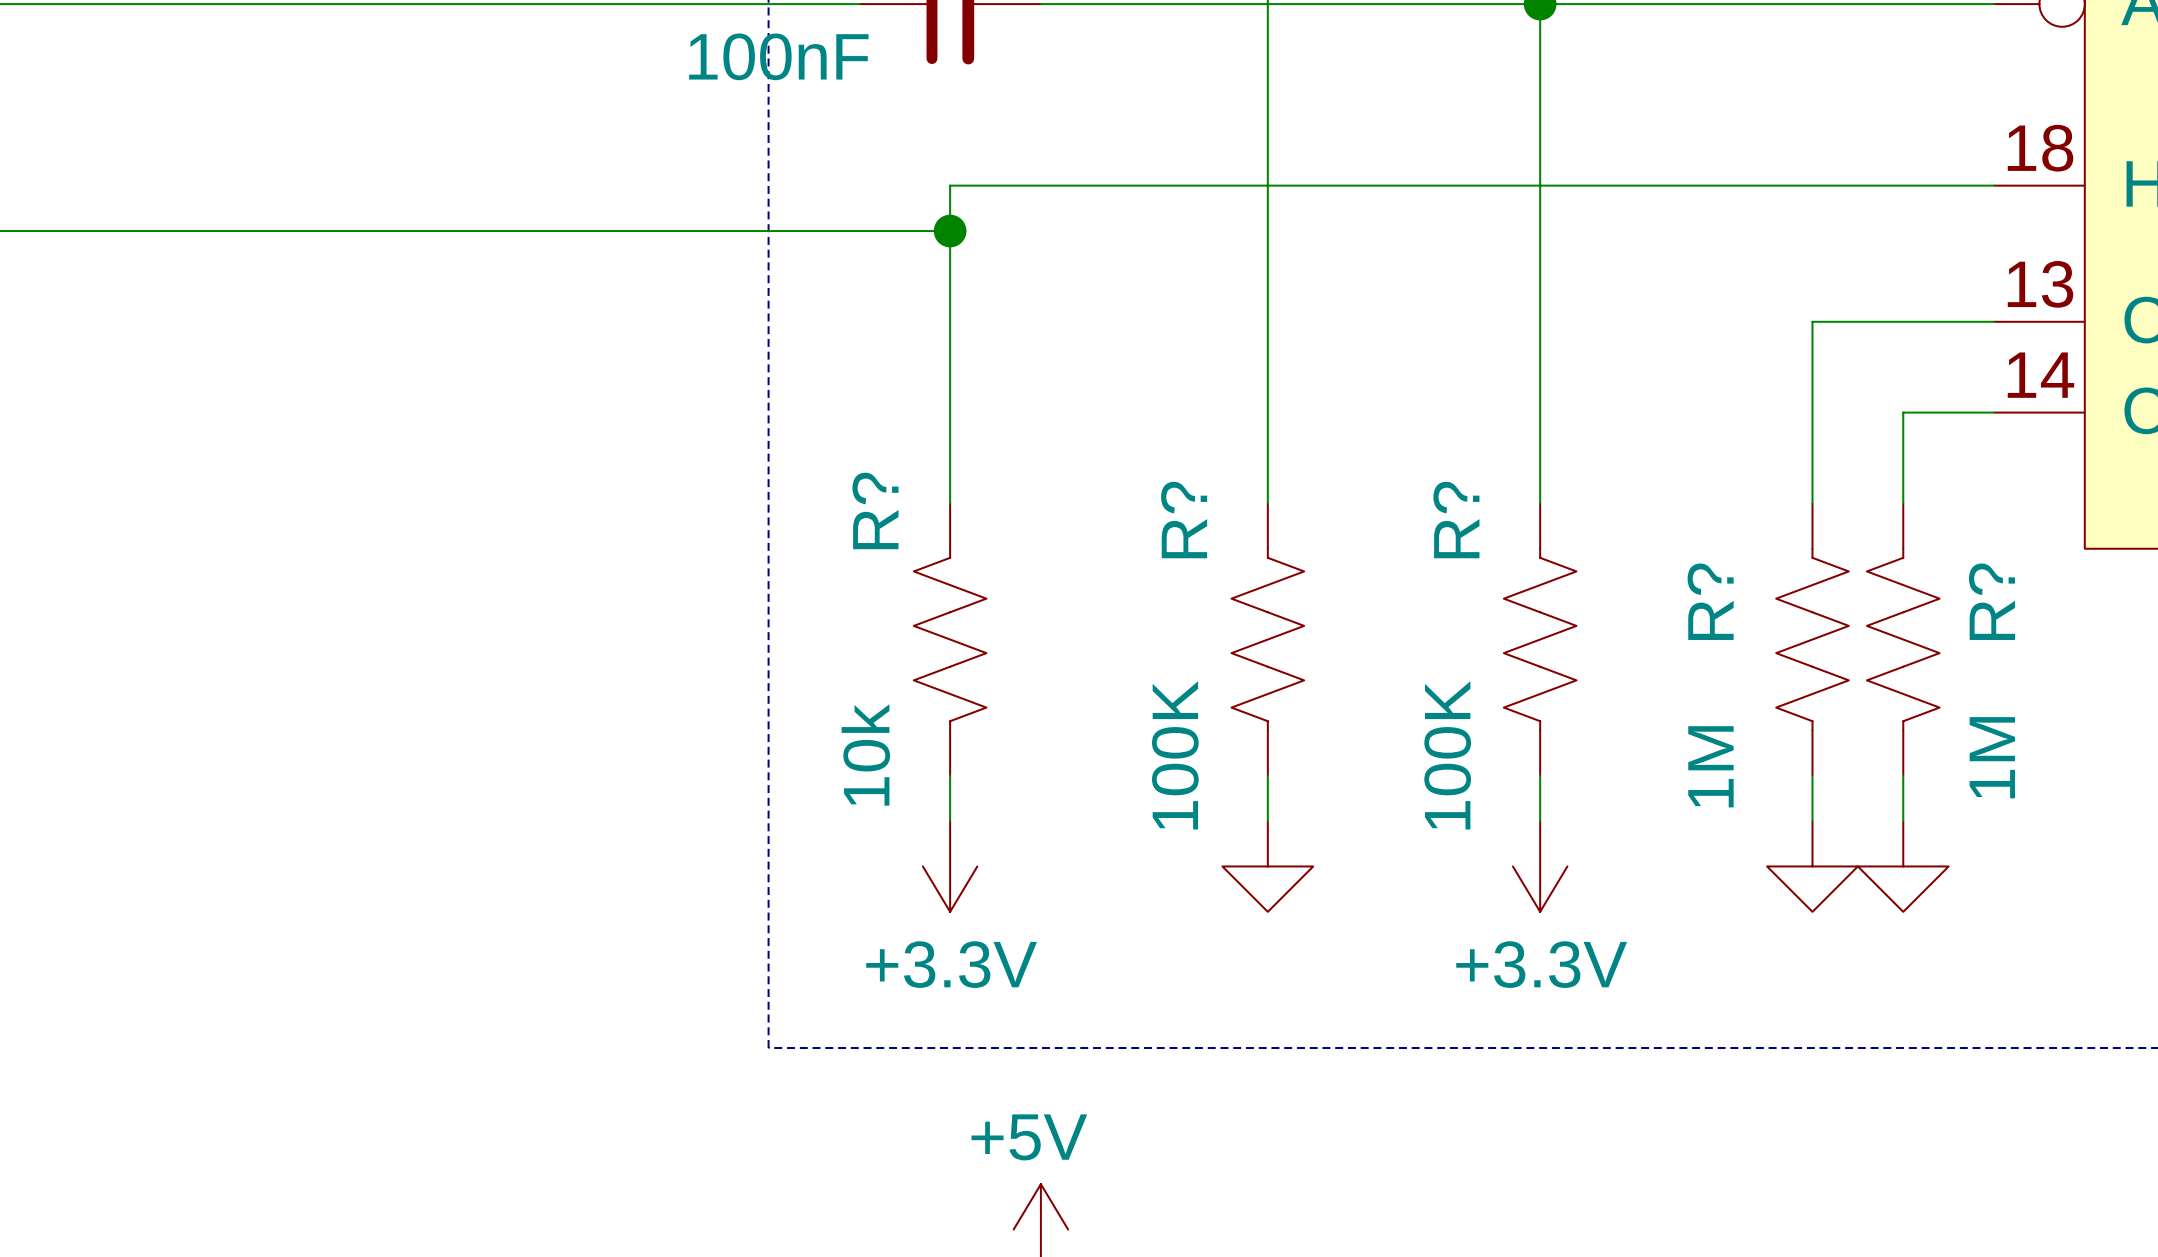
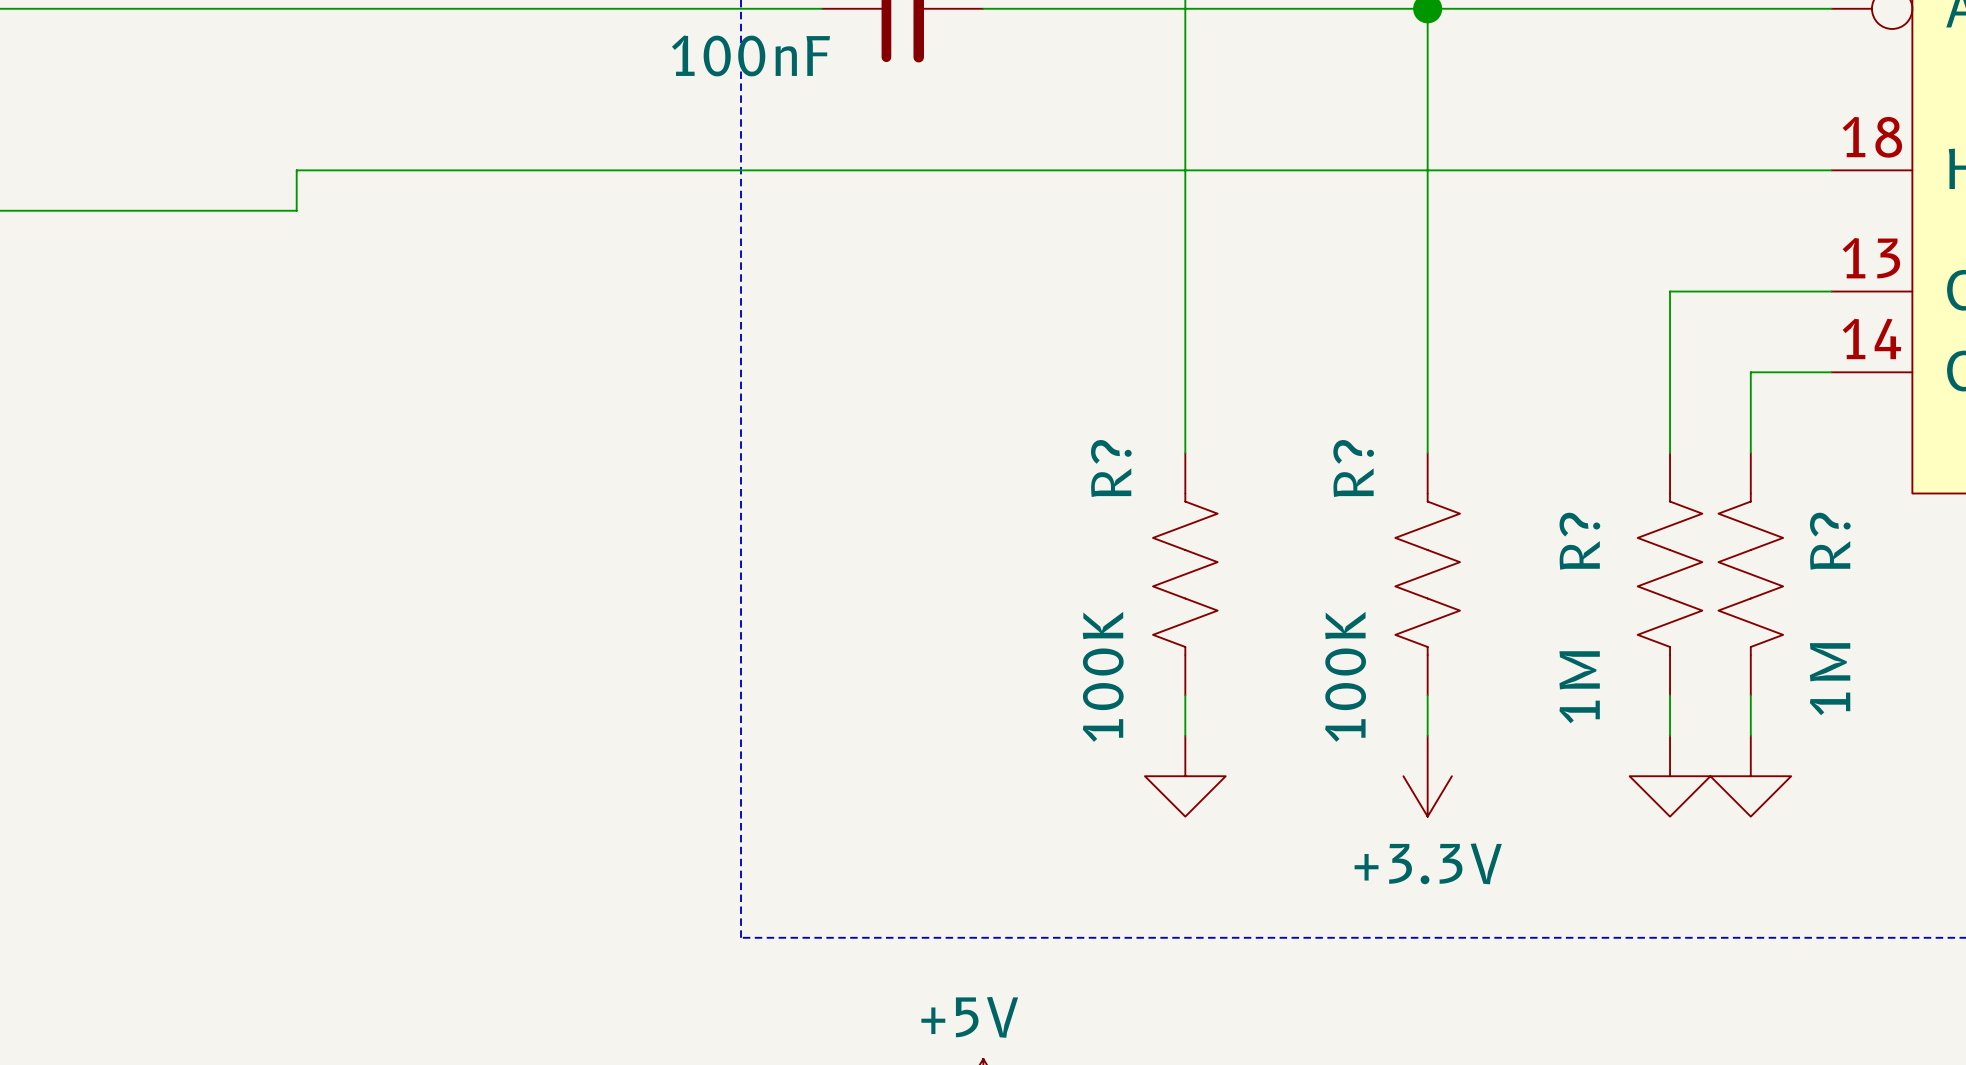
wire: (950, 185) (950, 503) -> none
wire: (269, 231) (950, 231) -> (296, 210) (296, 170) (902, 170)
junction: (950, 231) -> none
R?: 10k (950, 639) -> none
wire: (950, 775) (950, 821) -> none
power symbol: +3.3V (950, 866) -> none

